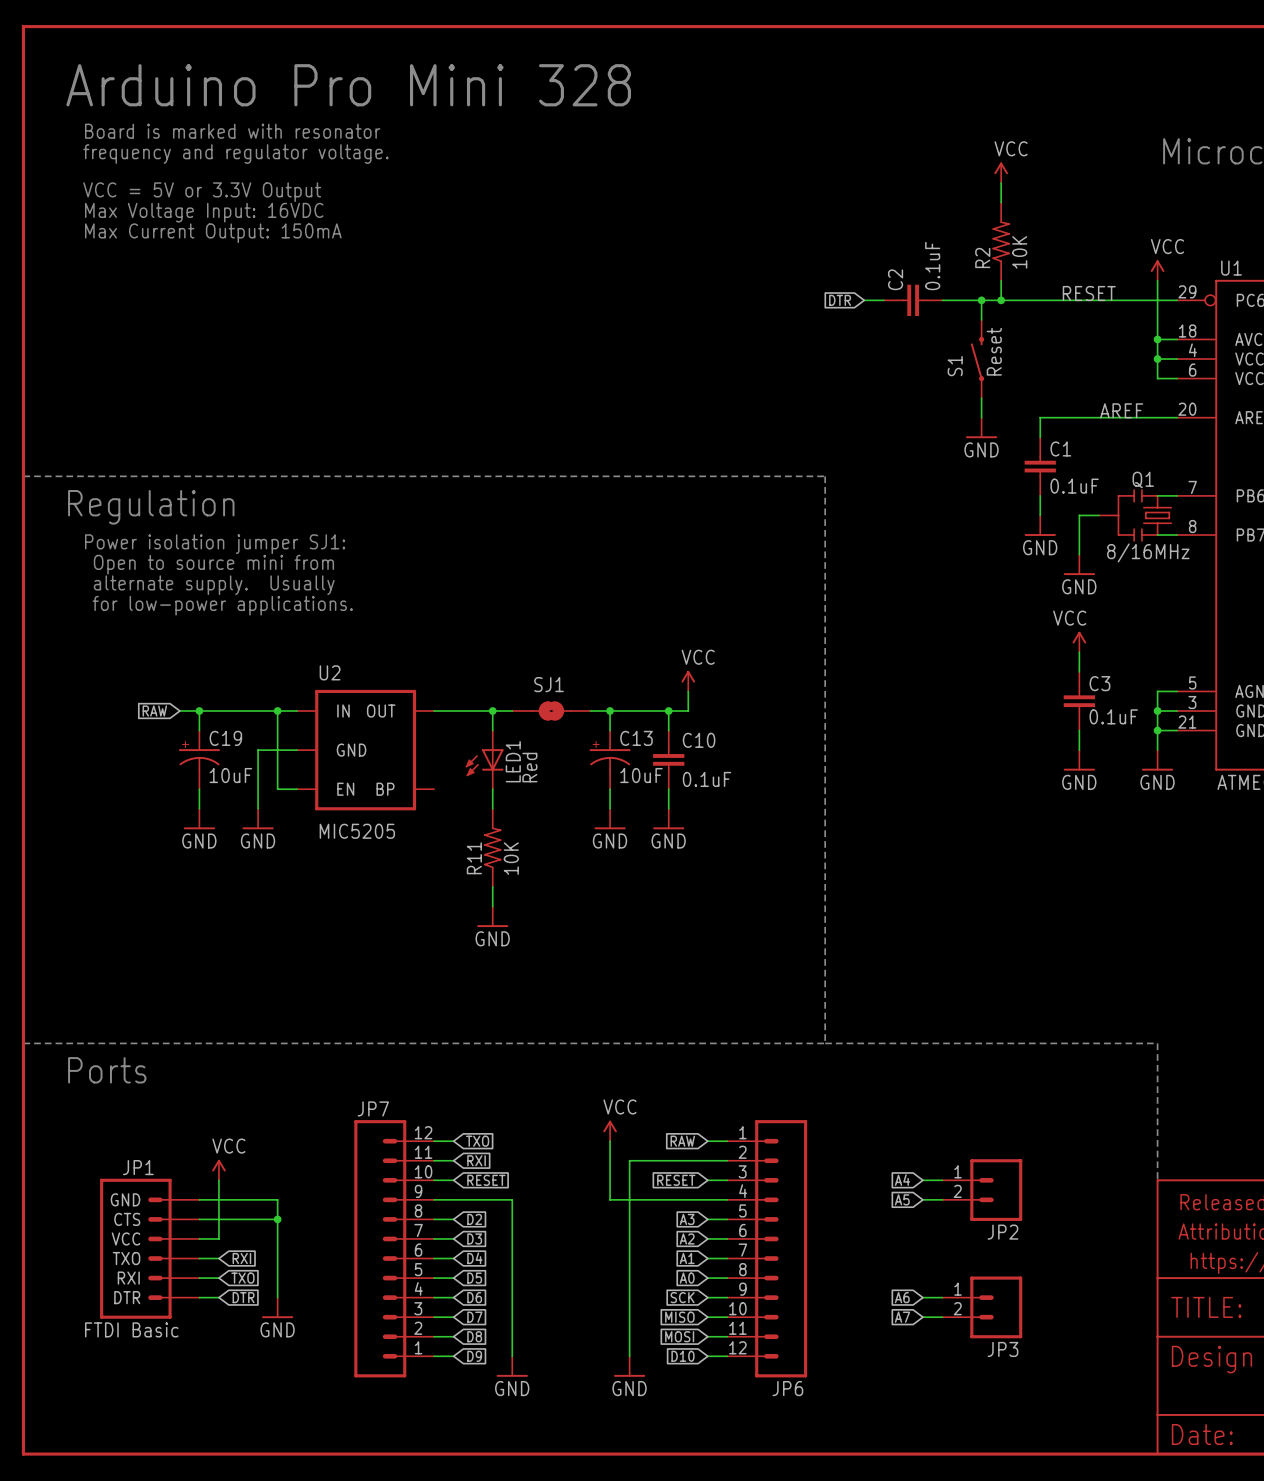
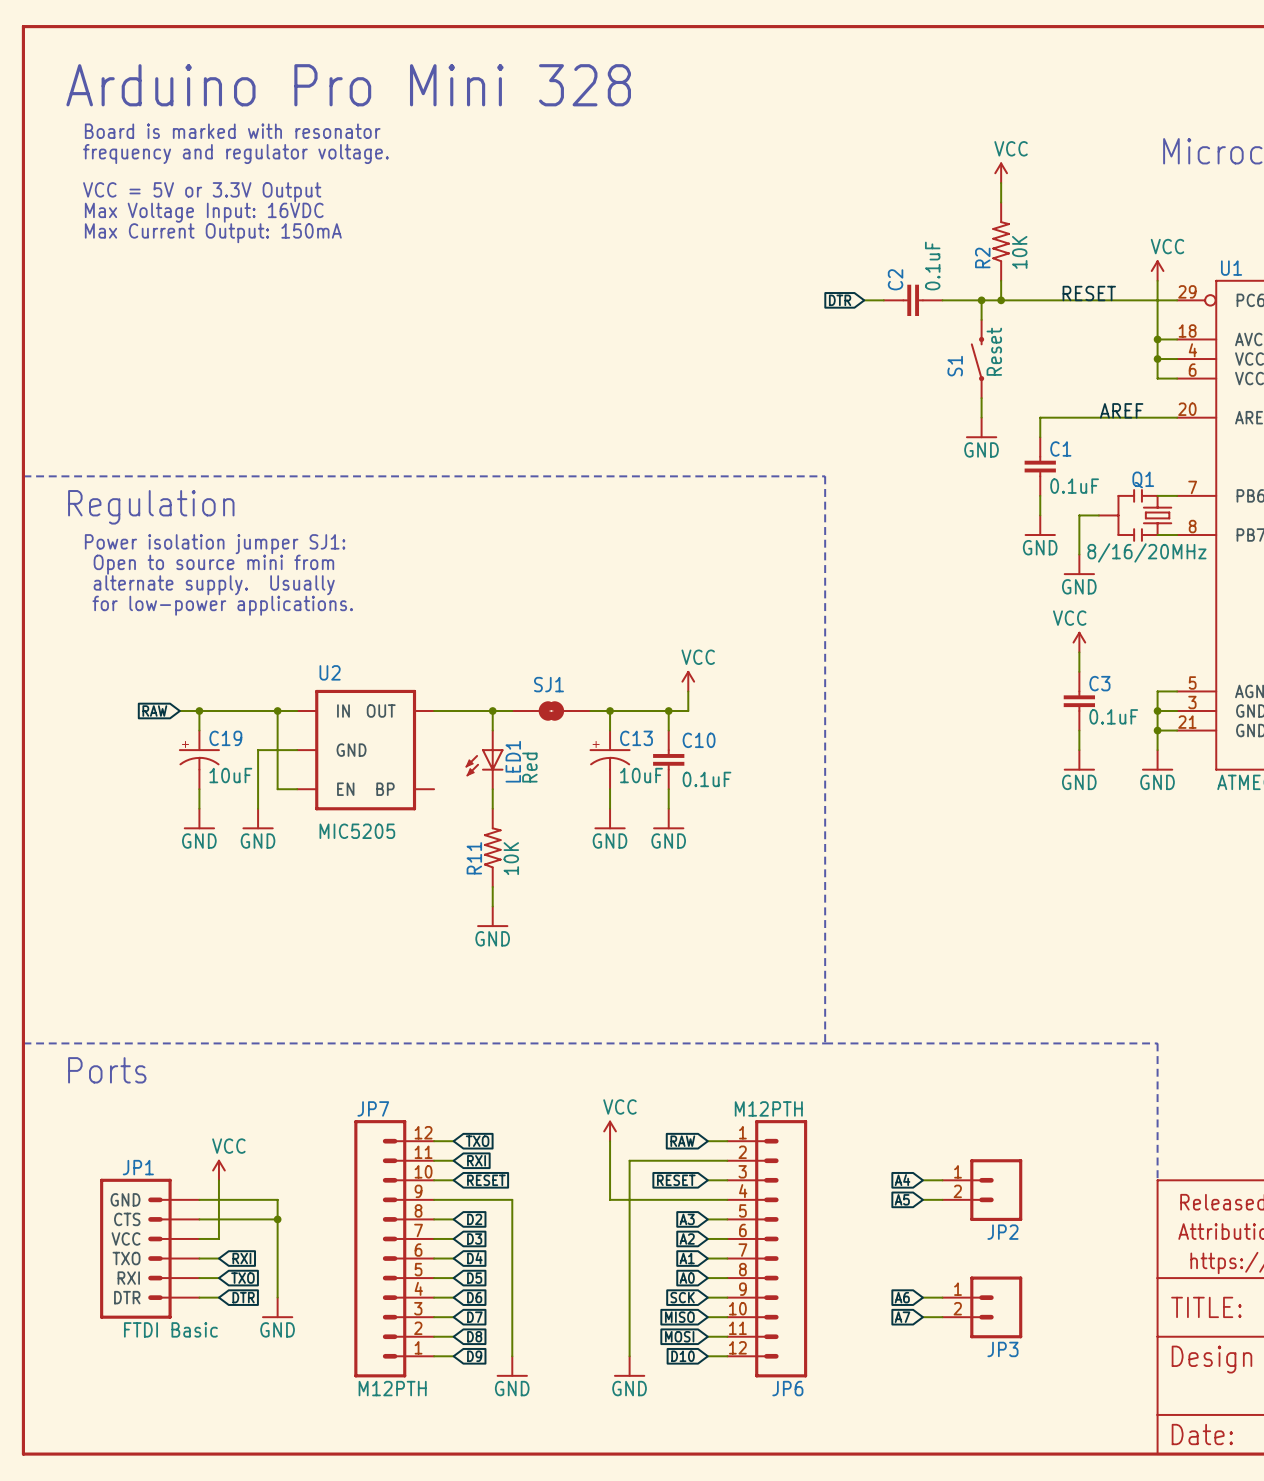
Q1 value: 8/16MHz (1148, 552) -> 8/16/20MHz (1146, 552)
JP6 value: none -> M12PTH (768, 1108)
JP1 value position: FTDI Basic (131, 1329) -> FTDI Basic (170, 1329)
JP7 value: none -> M12PTH (392, 1388)

